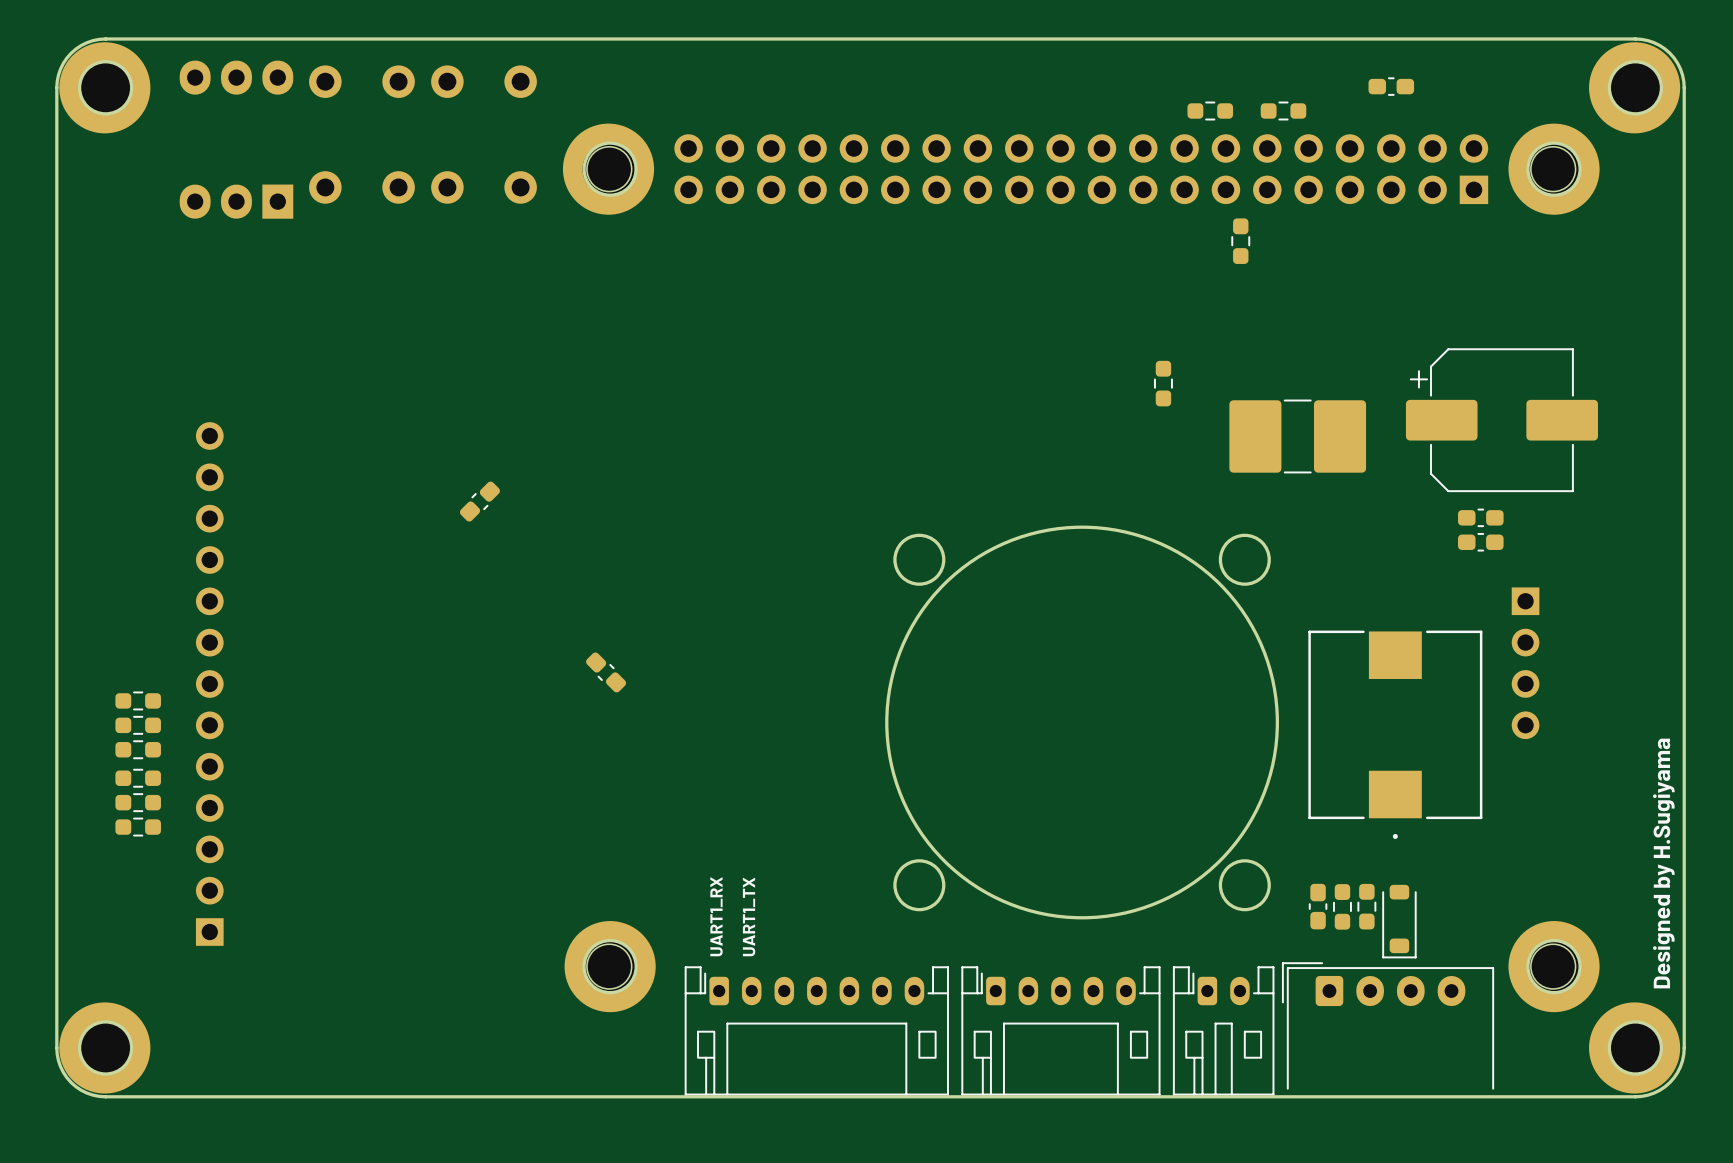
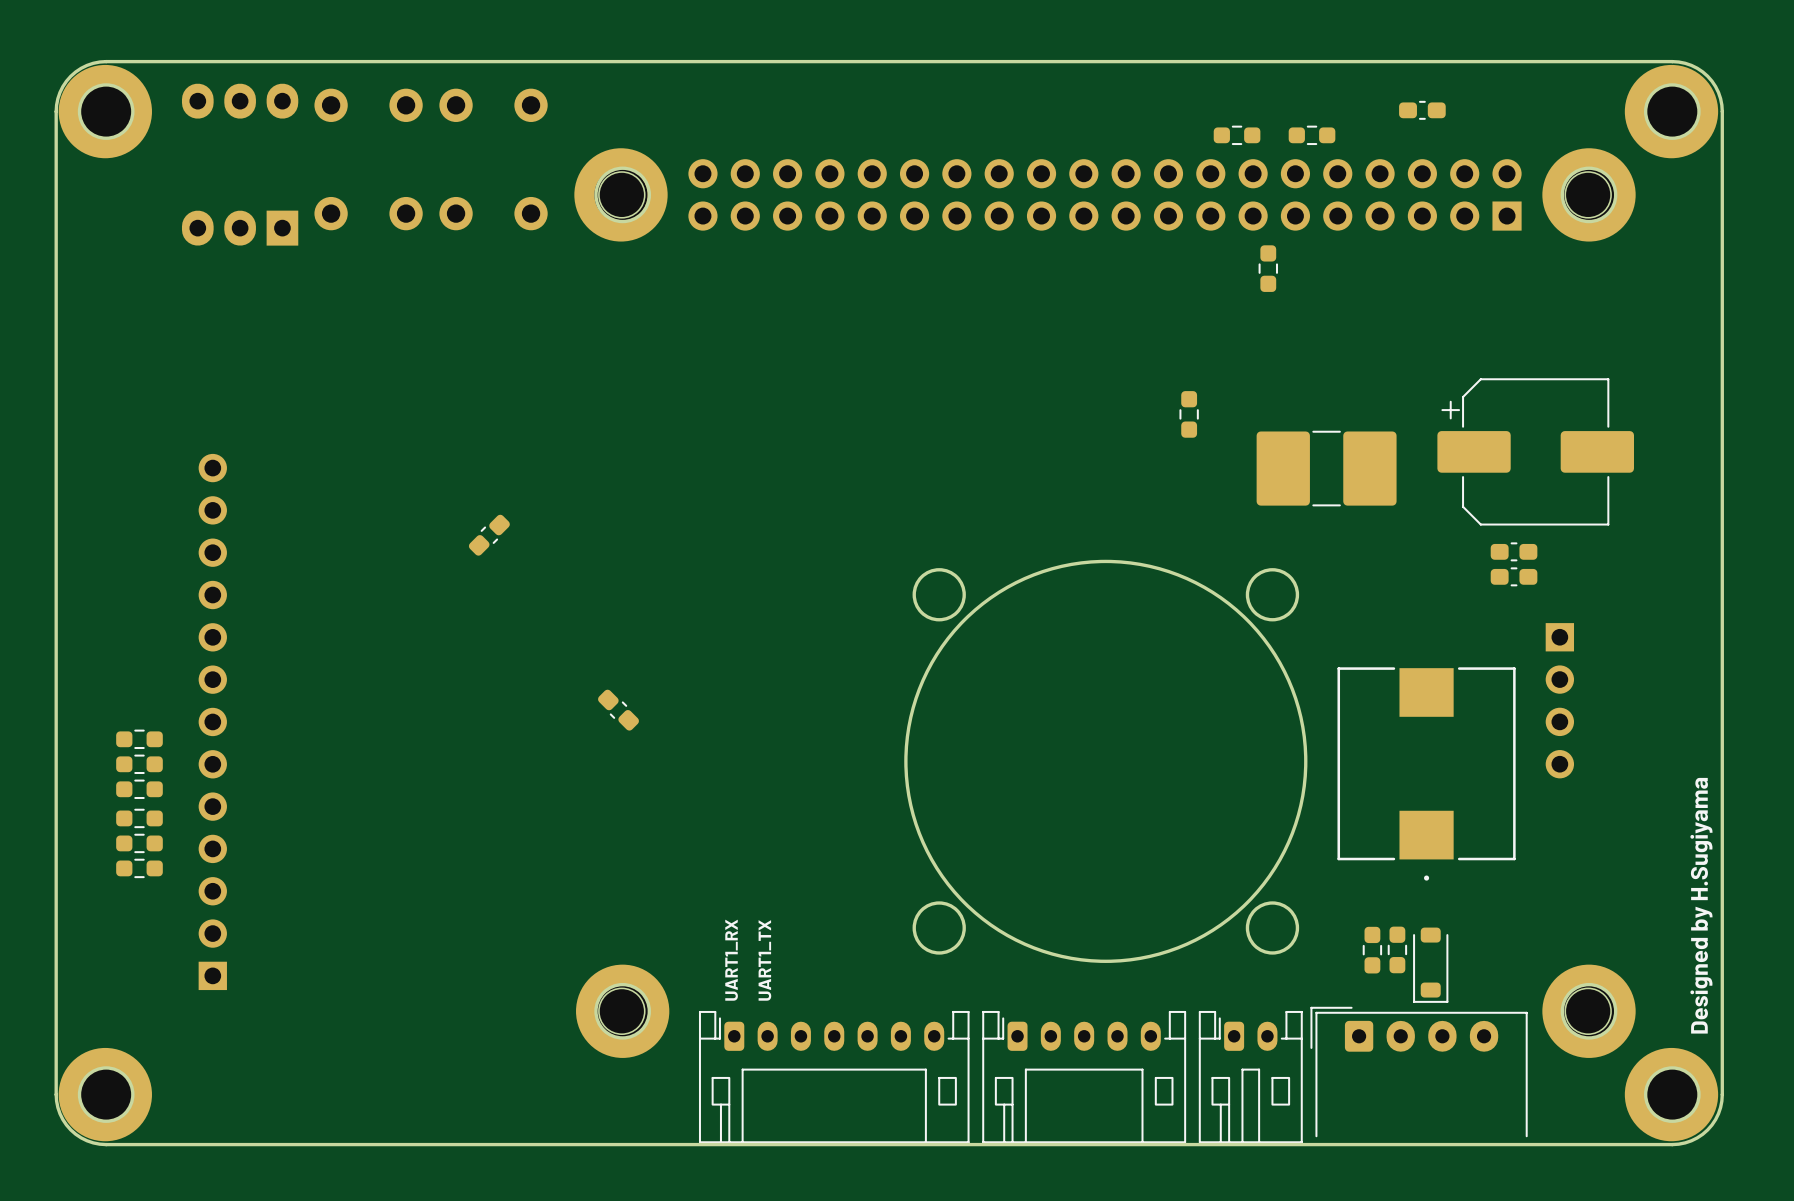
part: (1318, 906) -> none

